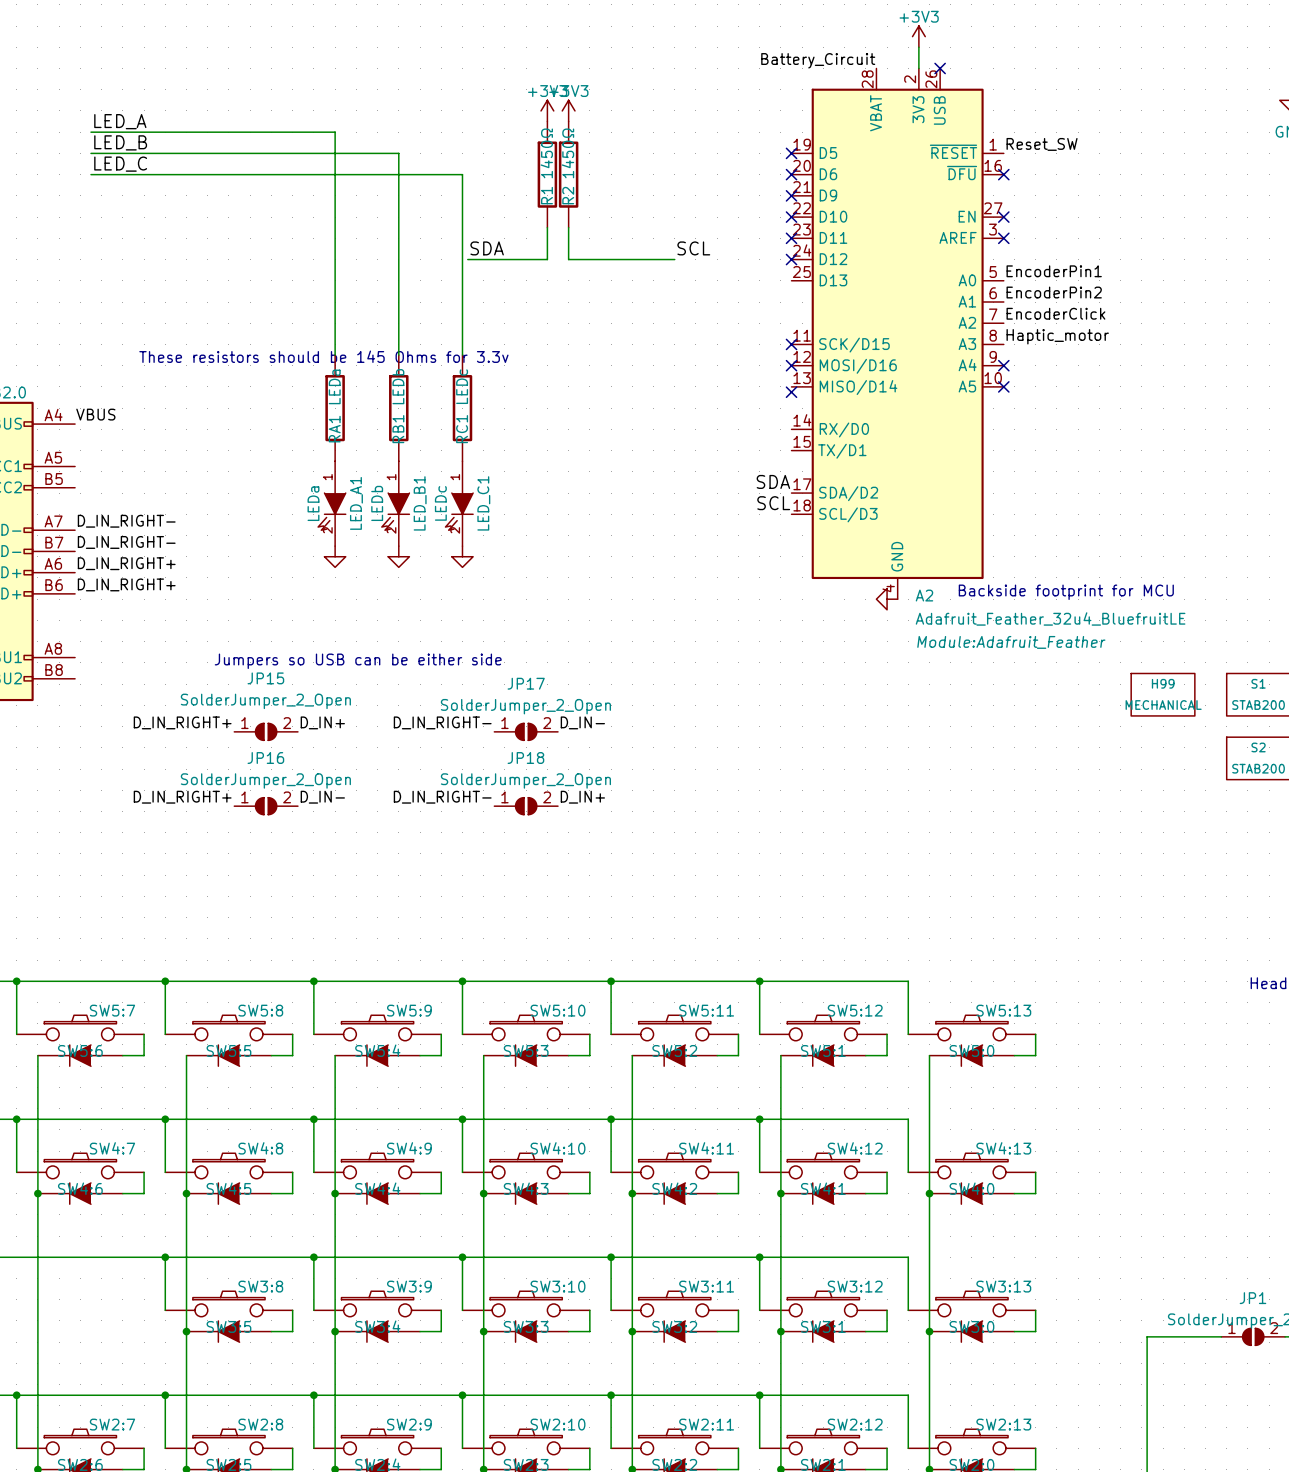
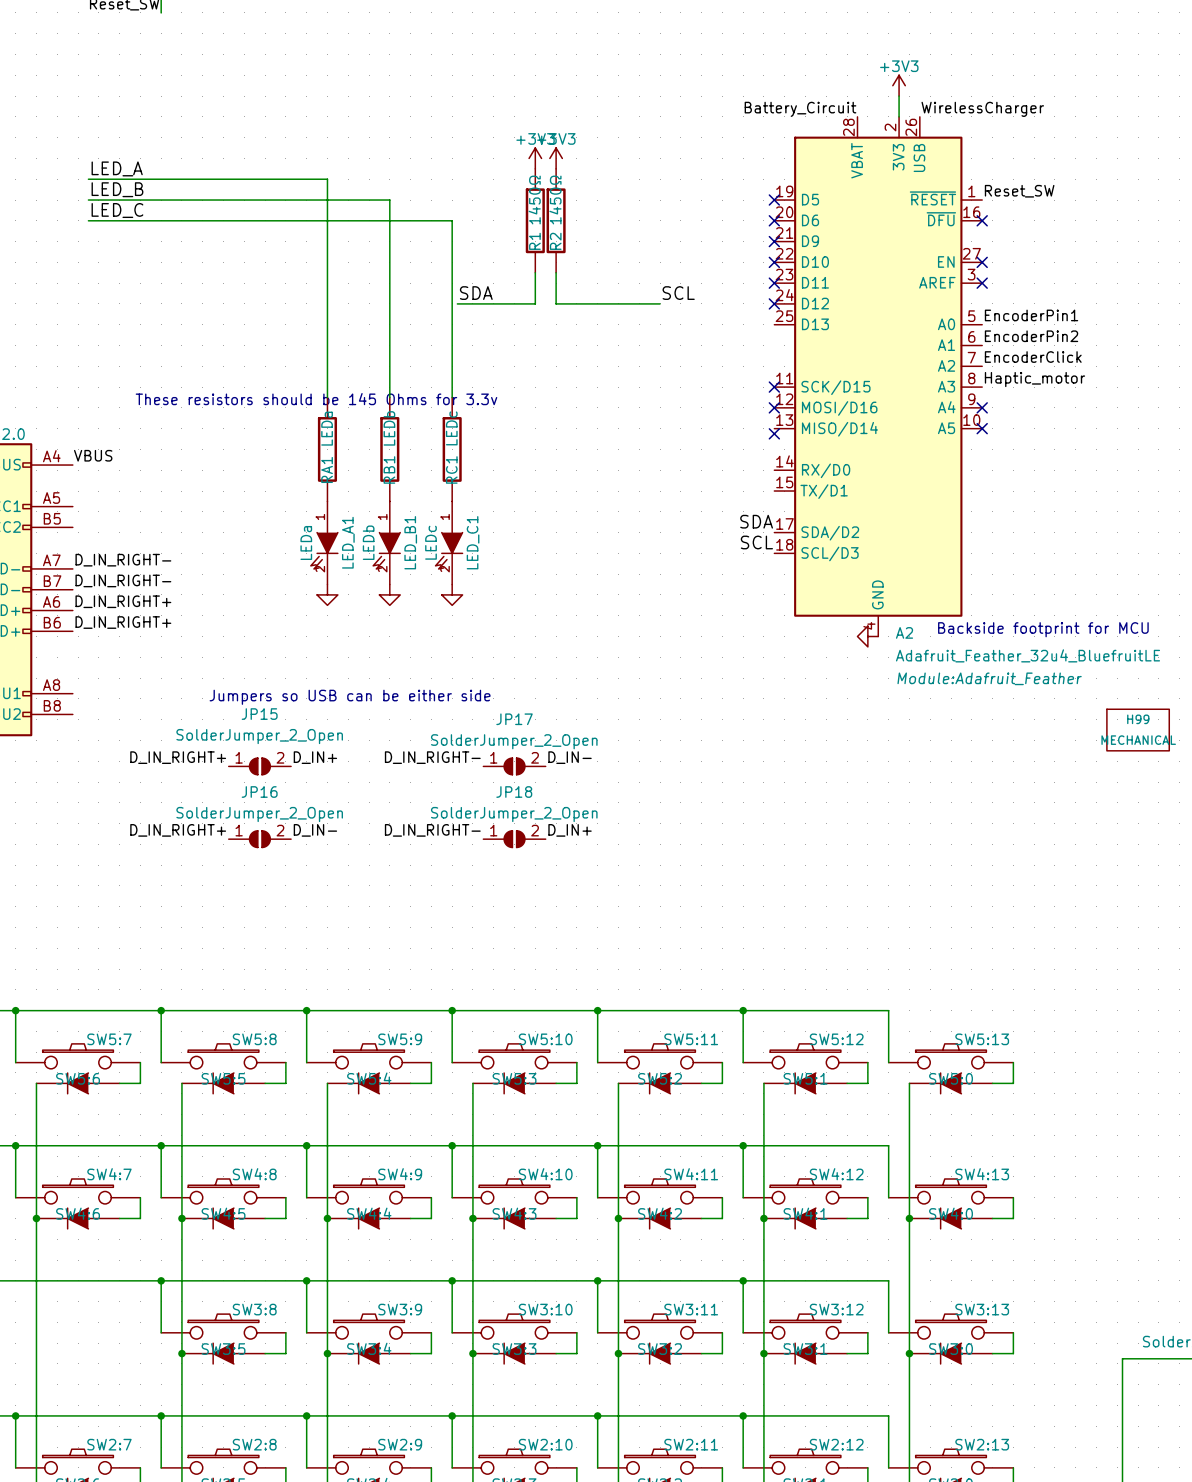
label: none -> WirelessCharger (982, 109)
no-connect mark: (940, 68) -> none

